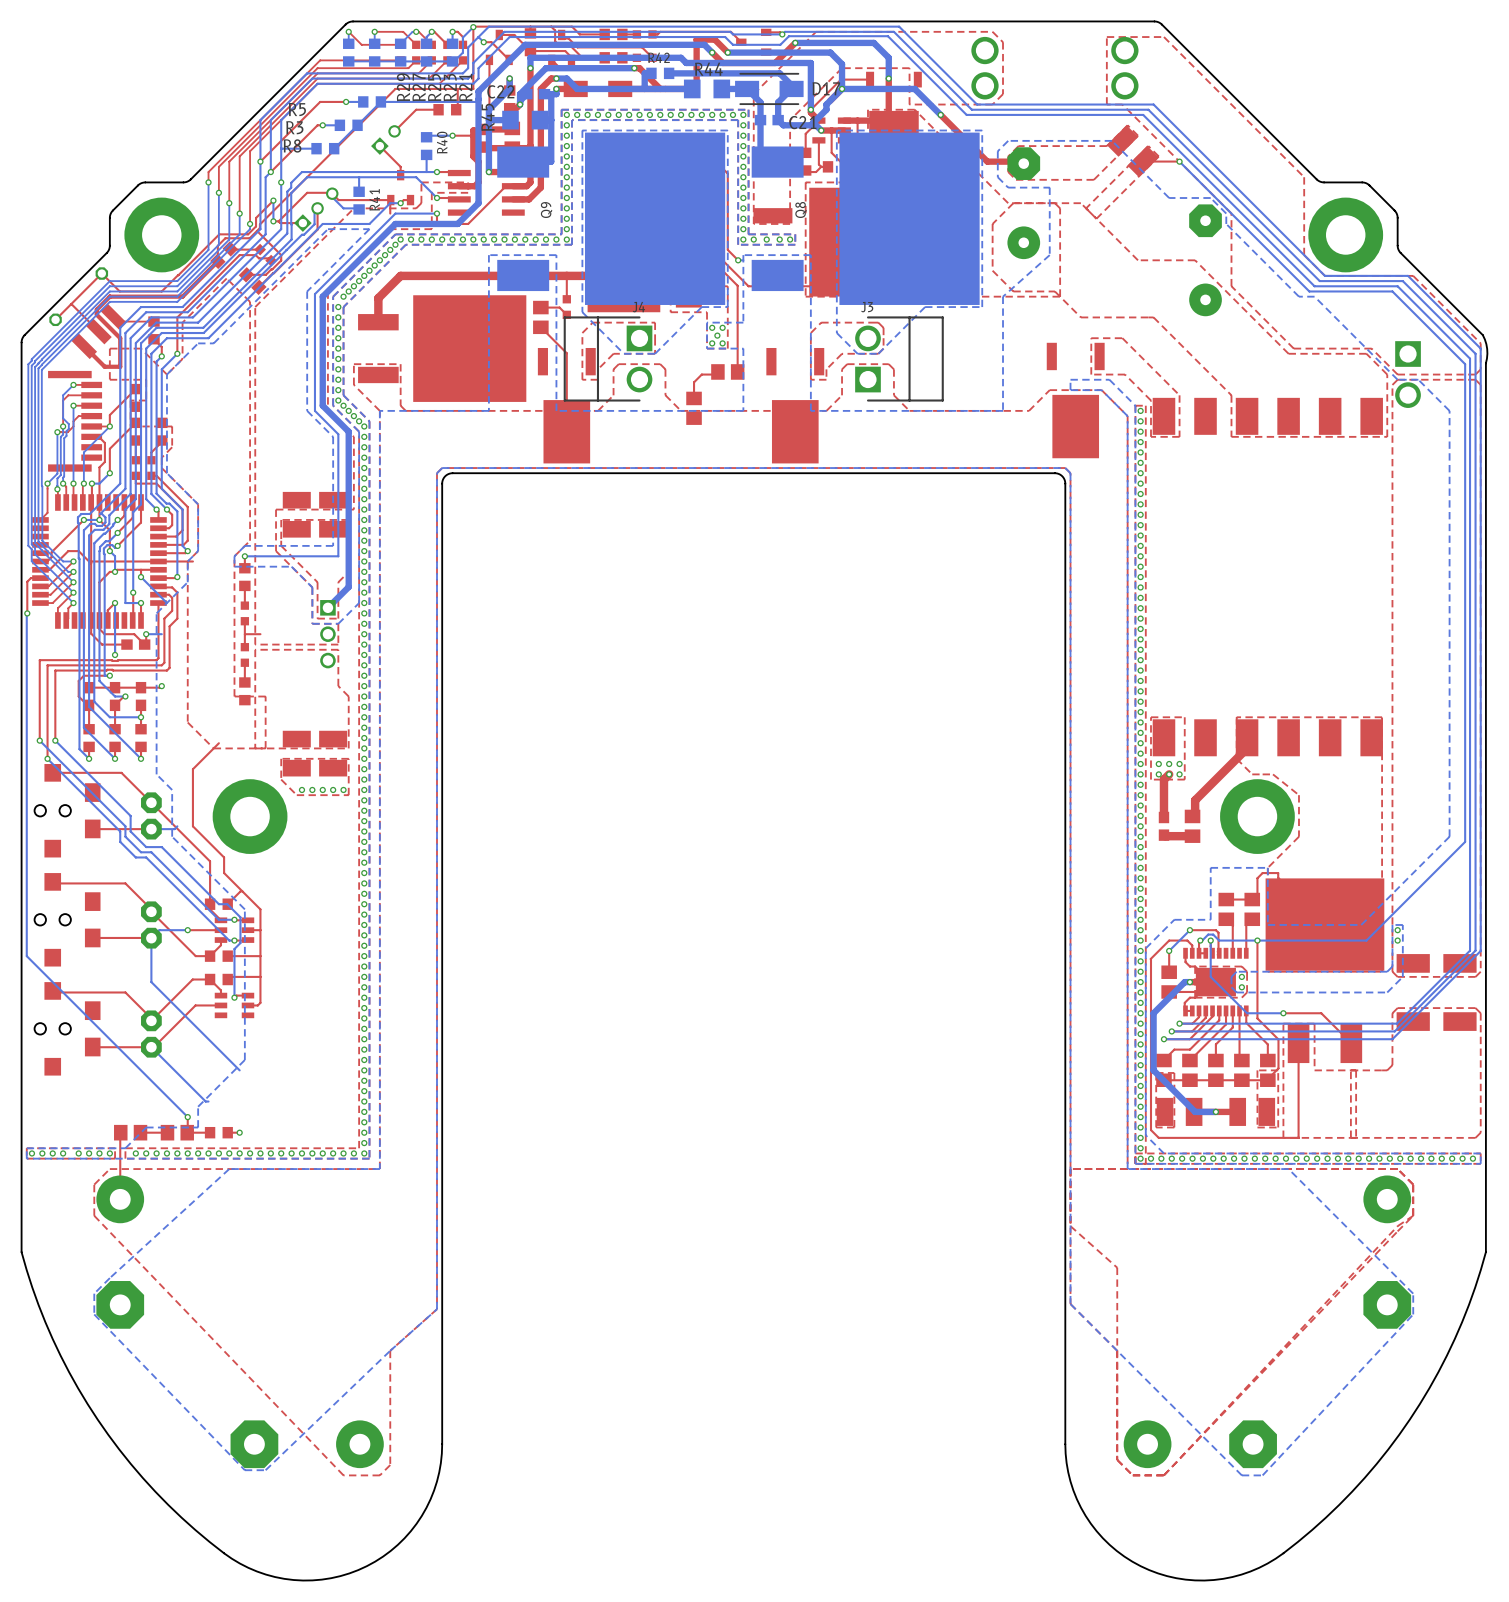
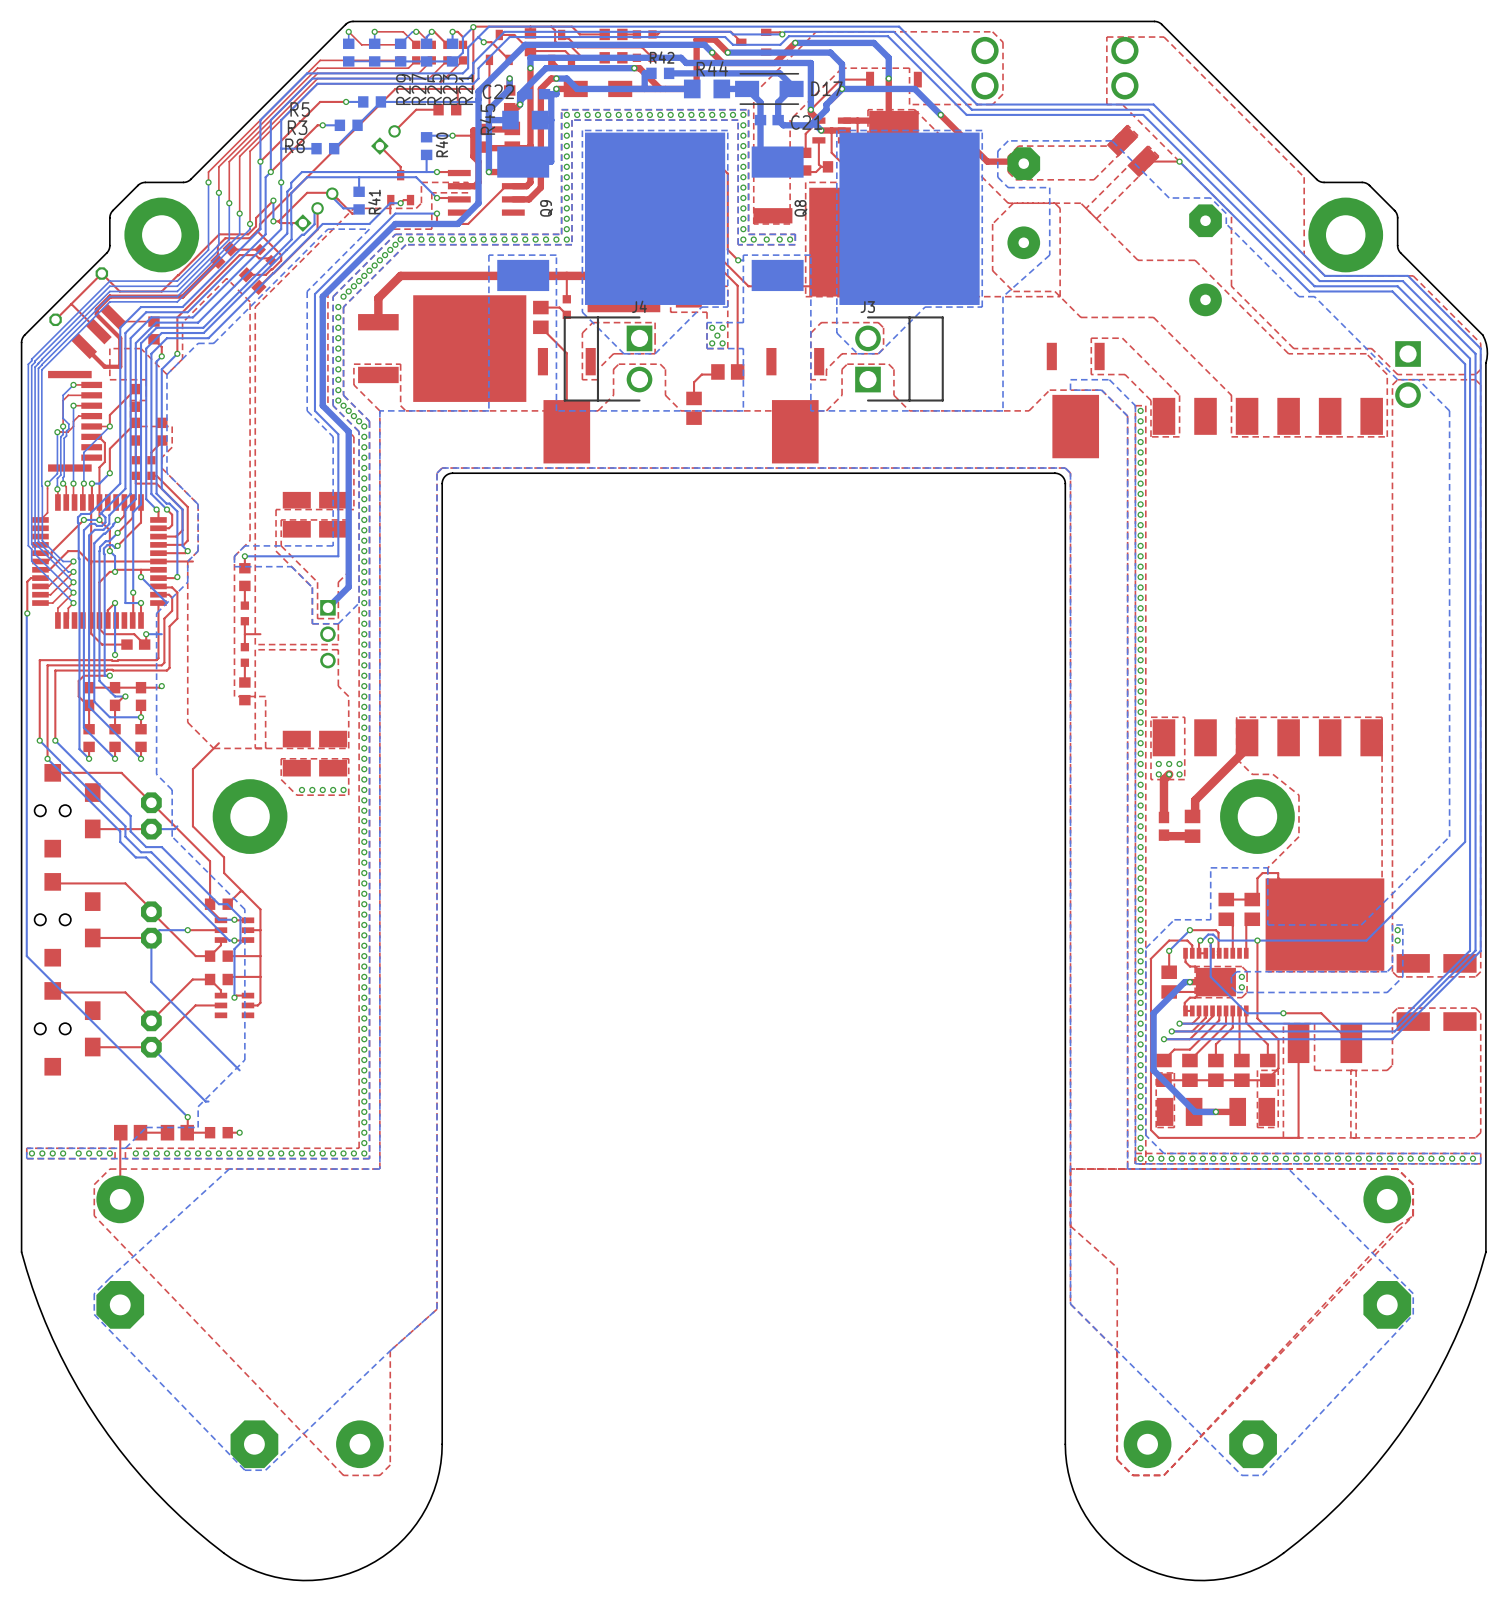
top track: (338, 200) (390, 200) -> (338, 200) (353, 213)

